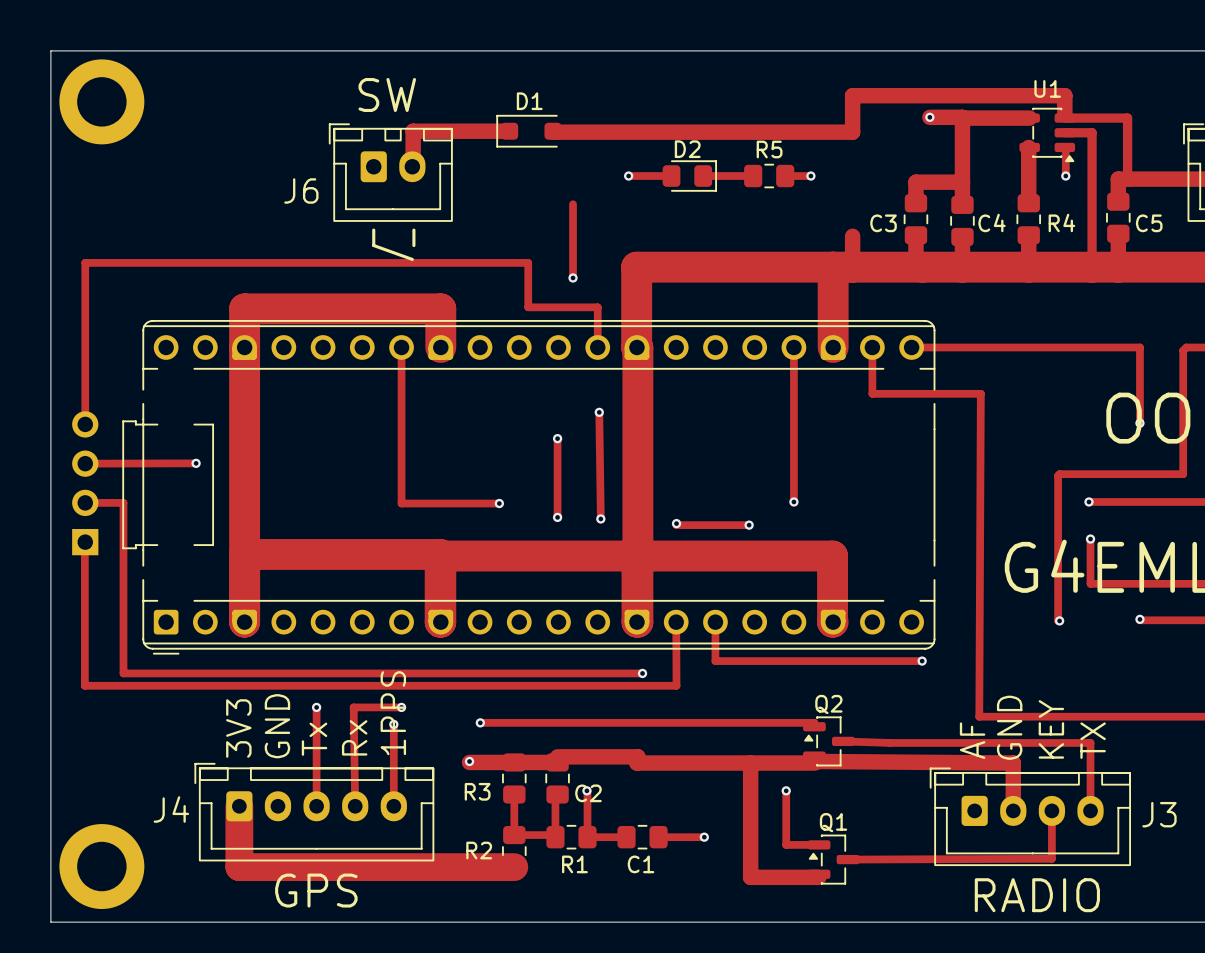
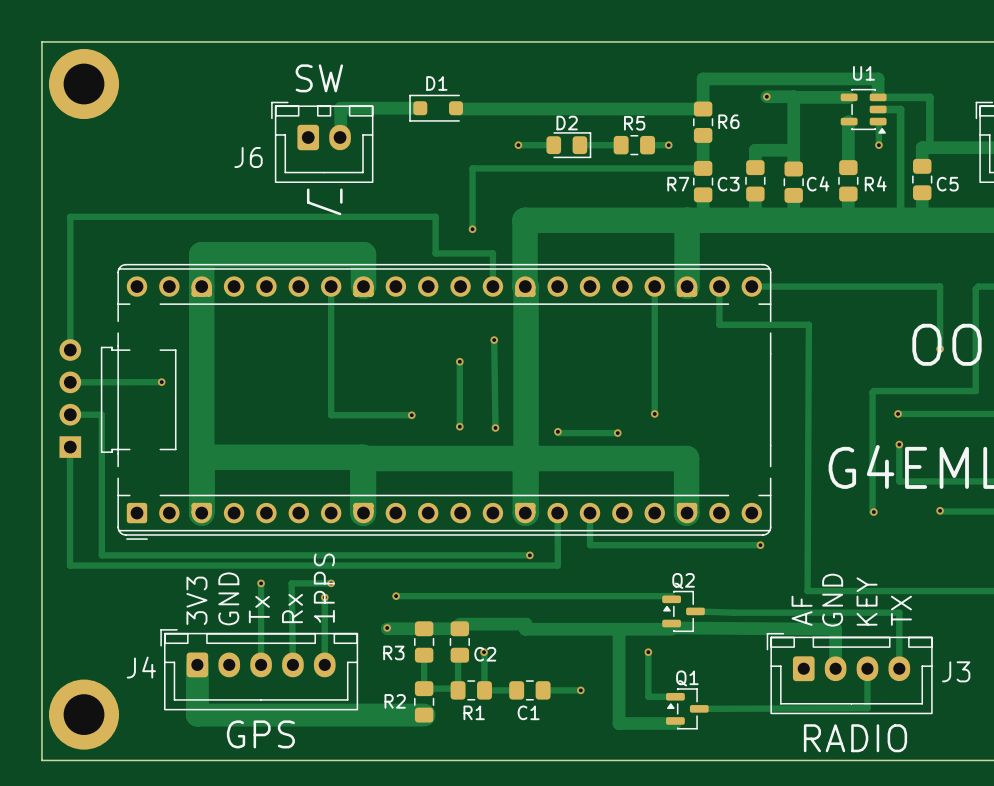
R6: none -> (703, 122)
track: none -> (703, 135) (703, 168) (472, 168)
R7: none -> (703, 181)

